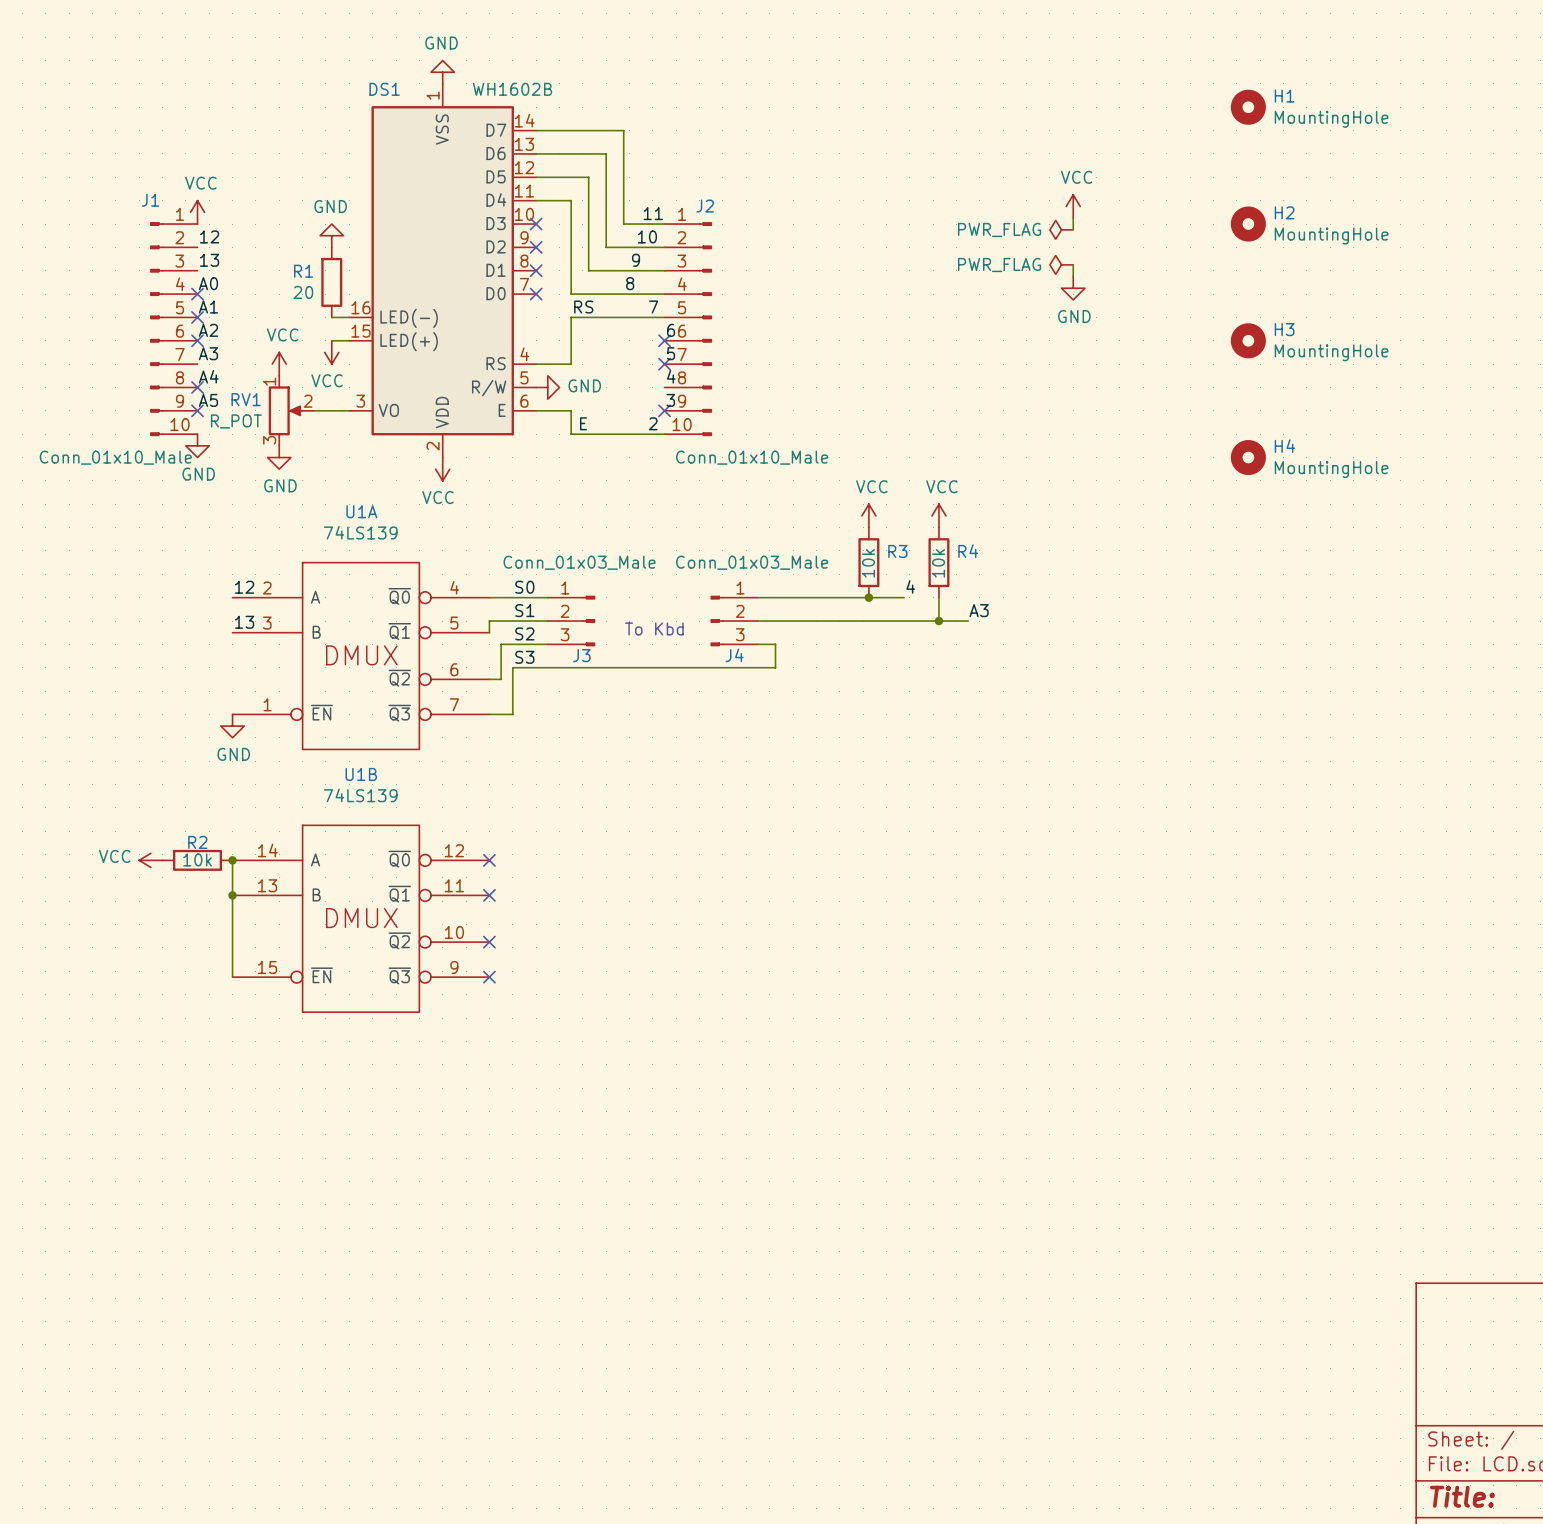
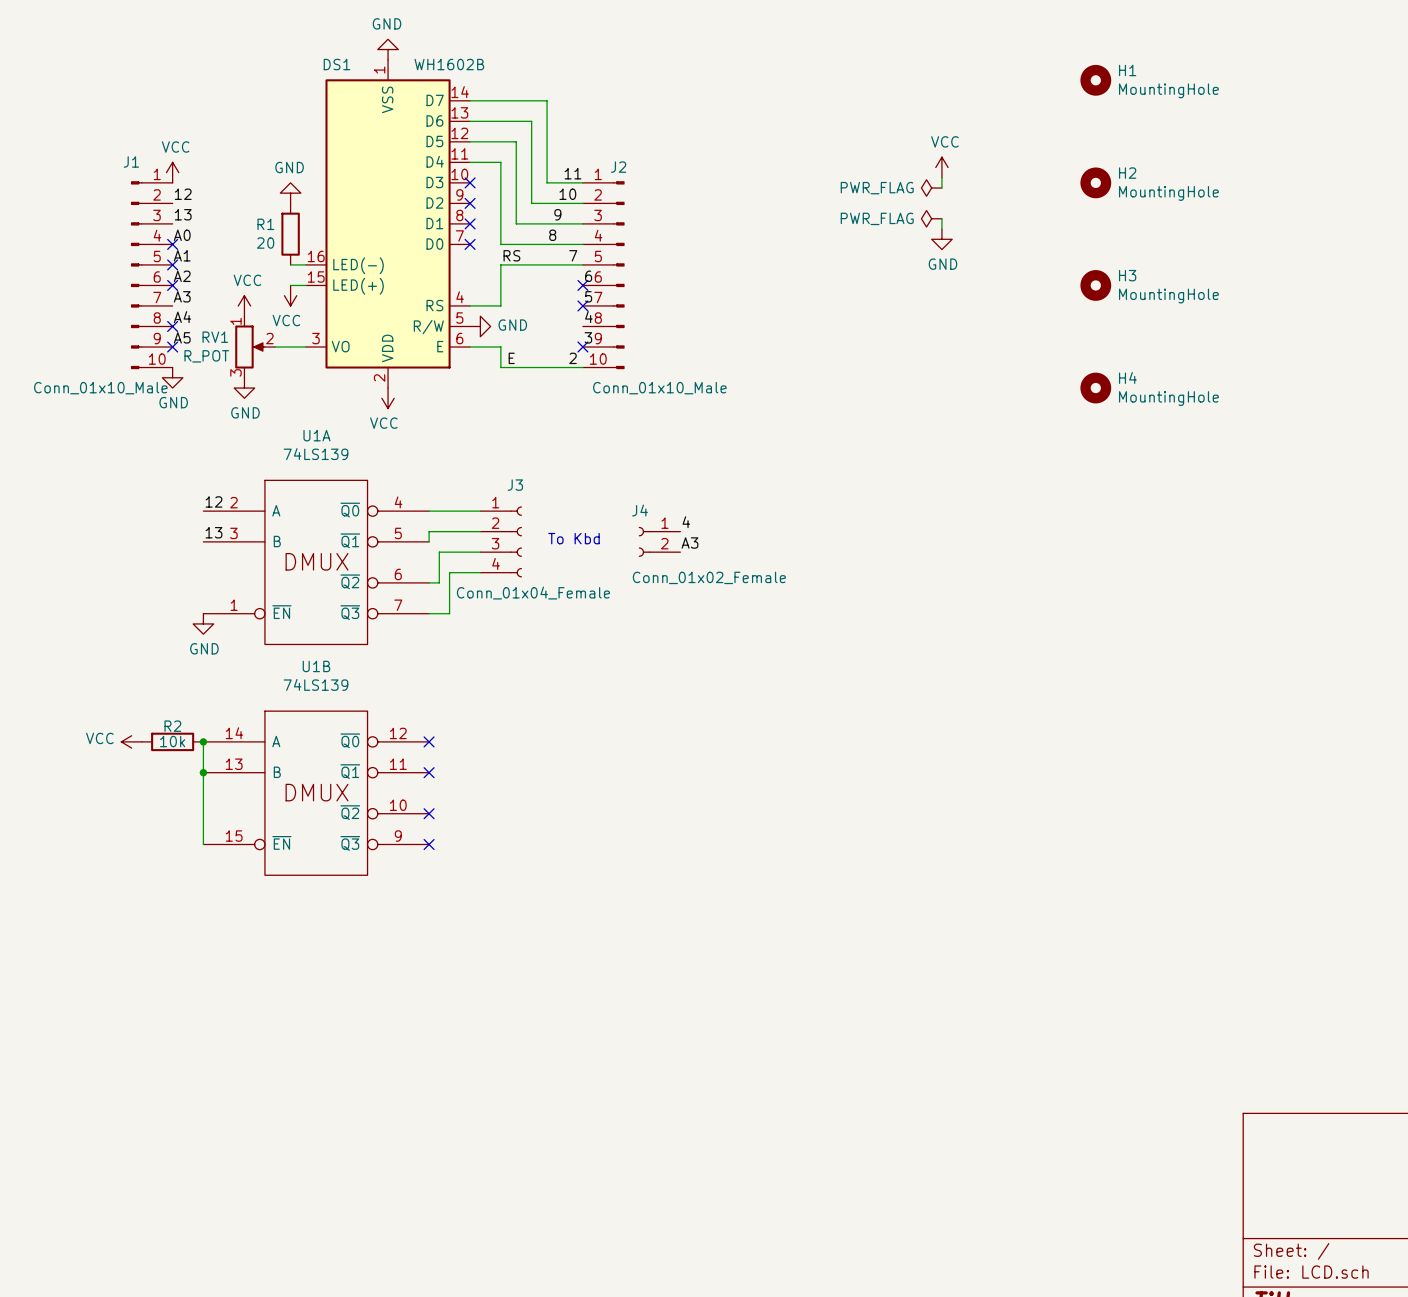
power symbol: VCC (868, 515) -> none
power symbol: VCC (938, 515) -> none
J3 value: Conn_01x03_Male (579, 562) -> Conn_01x04_Female (533, 593)
J4 value: Conn_01x03_Male (752, 562) -> Conn_01x02_Female (709, 577)
R3: 10k (868, 562) -> none
R4: 10k (938, 562) -> none
label position: 4 (910, 586) -> 4 (686, 522)
label: S0 (524, 587) -> none
J3 symbol: [547, 595, 596, 647] -> [480, 506, 522, 578]
J4 symbol: [710, 595, 758, 647] -> [638, 526, 681, 557]
wire: (757, 597) (903, 597) -> none
junction: (868, 597) -> none
wire: (938, 597) (938, 621) -> none
label: S1 (524, 610) -> none
label position: A3 (979, 610) -> A3 (689, 543)
wire: (757, 621) (968, 621) -> none
junction: (938, 621) -> none
label: S2 (524, 633) -> none
wire: (757, 644) (775, 644) (775, 667) (547, 667) -> none
J3 name position: J3 (581, 655) -> J3 (515, 485)
J4 name position: J4 (734, 655) -> J4 (640, 510)
label: S3 (524, 657) -> none

